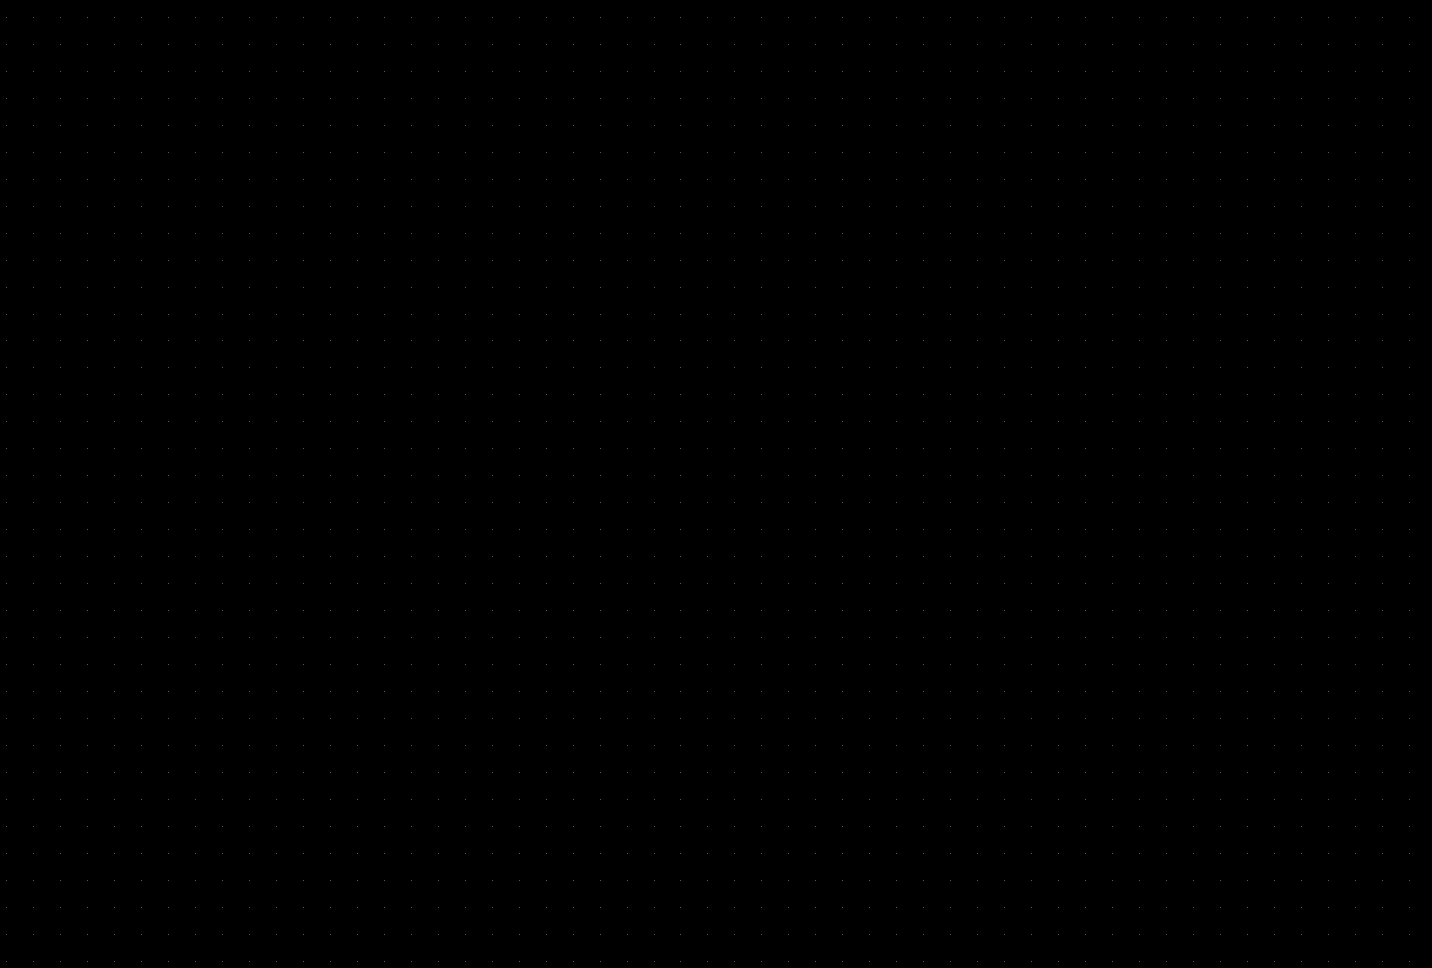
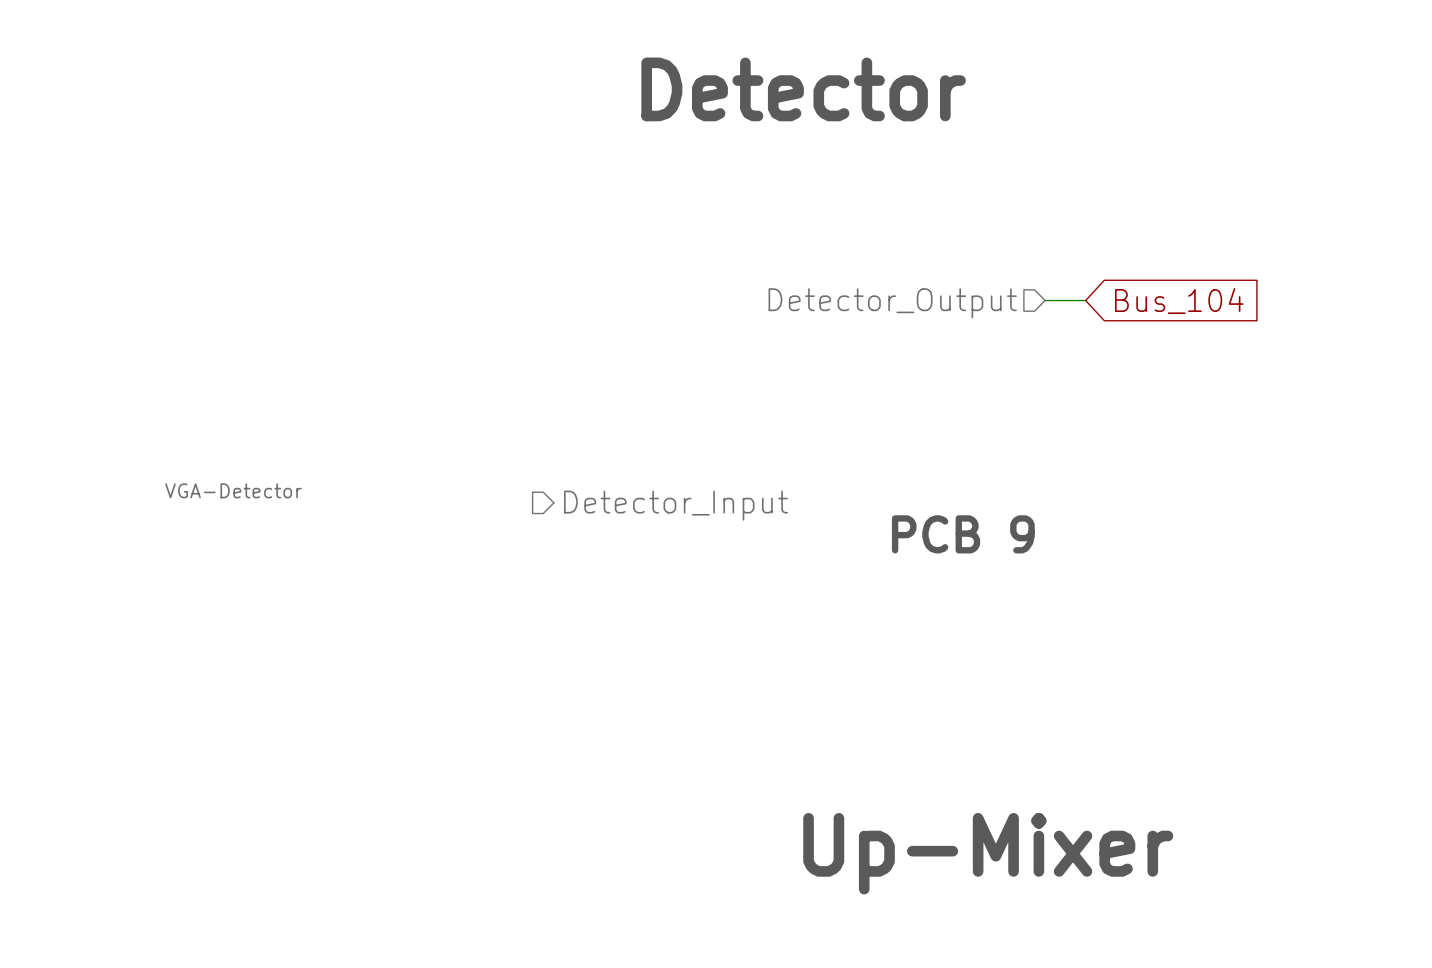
text: none -> Detector (803, 89)
wire: none -> (1045, 300) (1085, 300)
global label: none -> Bus_104 (1179, 301)
sheet pin: none -> Detector_Output (892, 303)
label: none -> VGA-Detector (233, 490)
sheet pin: none -> Detector_Input (676, 505)
text: none -> PCB 9 (963, 534)
text: none -> Up-Mixer (988, 853)

